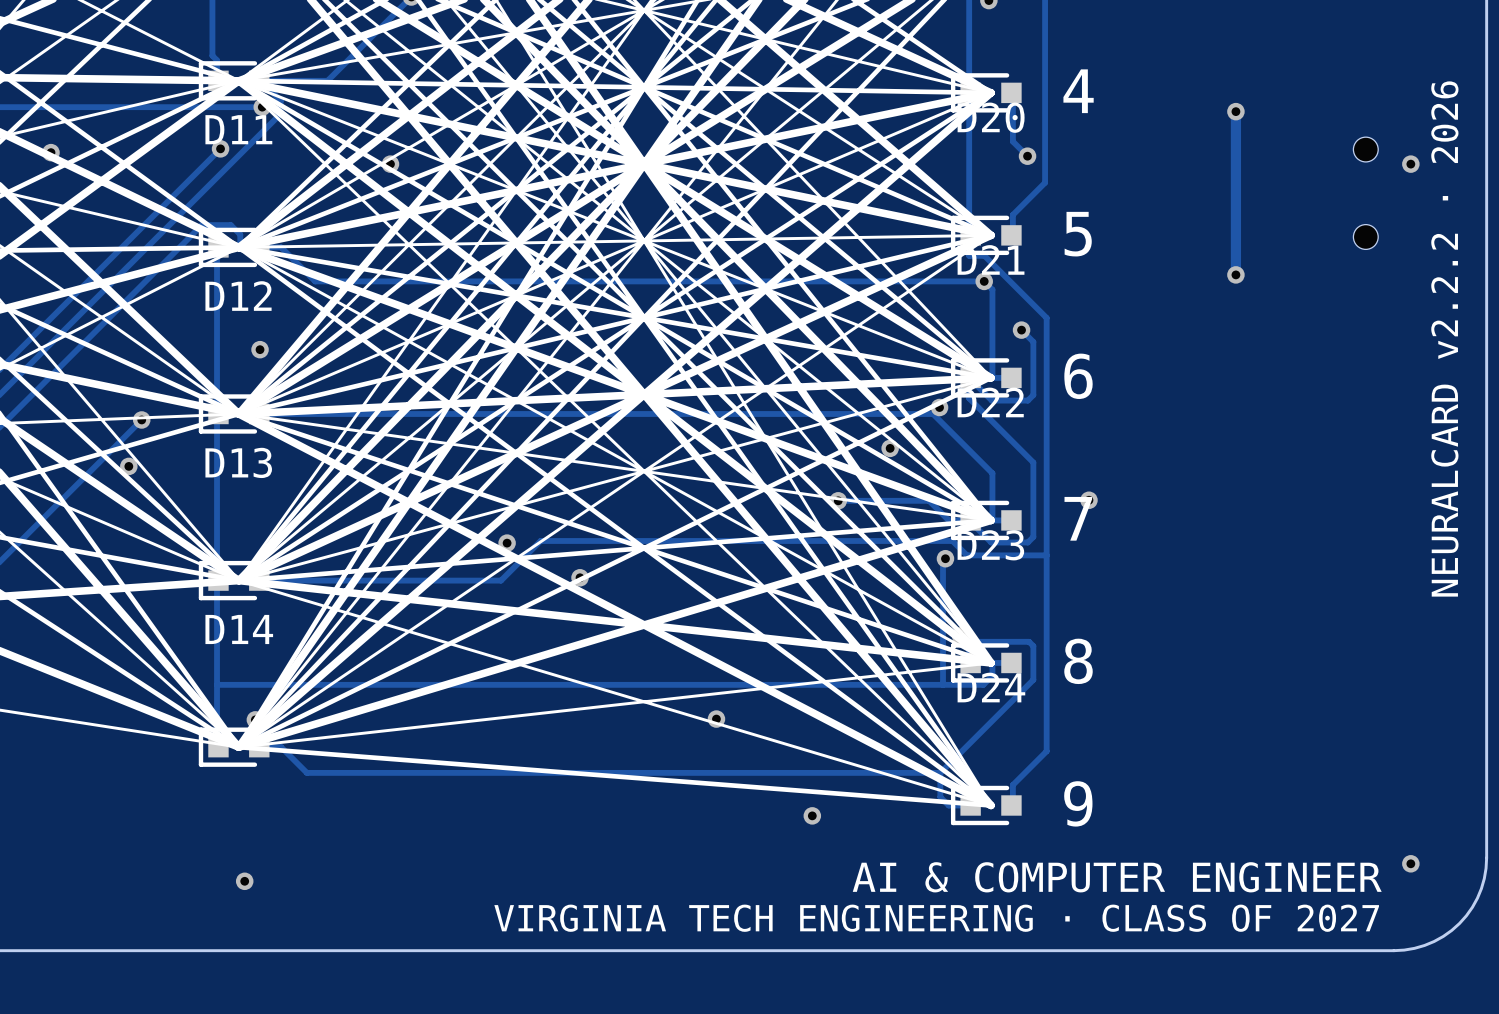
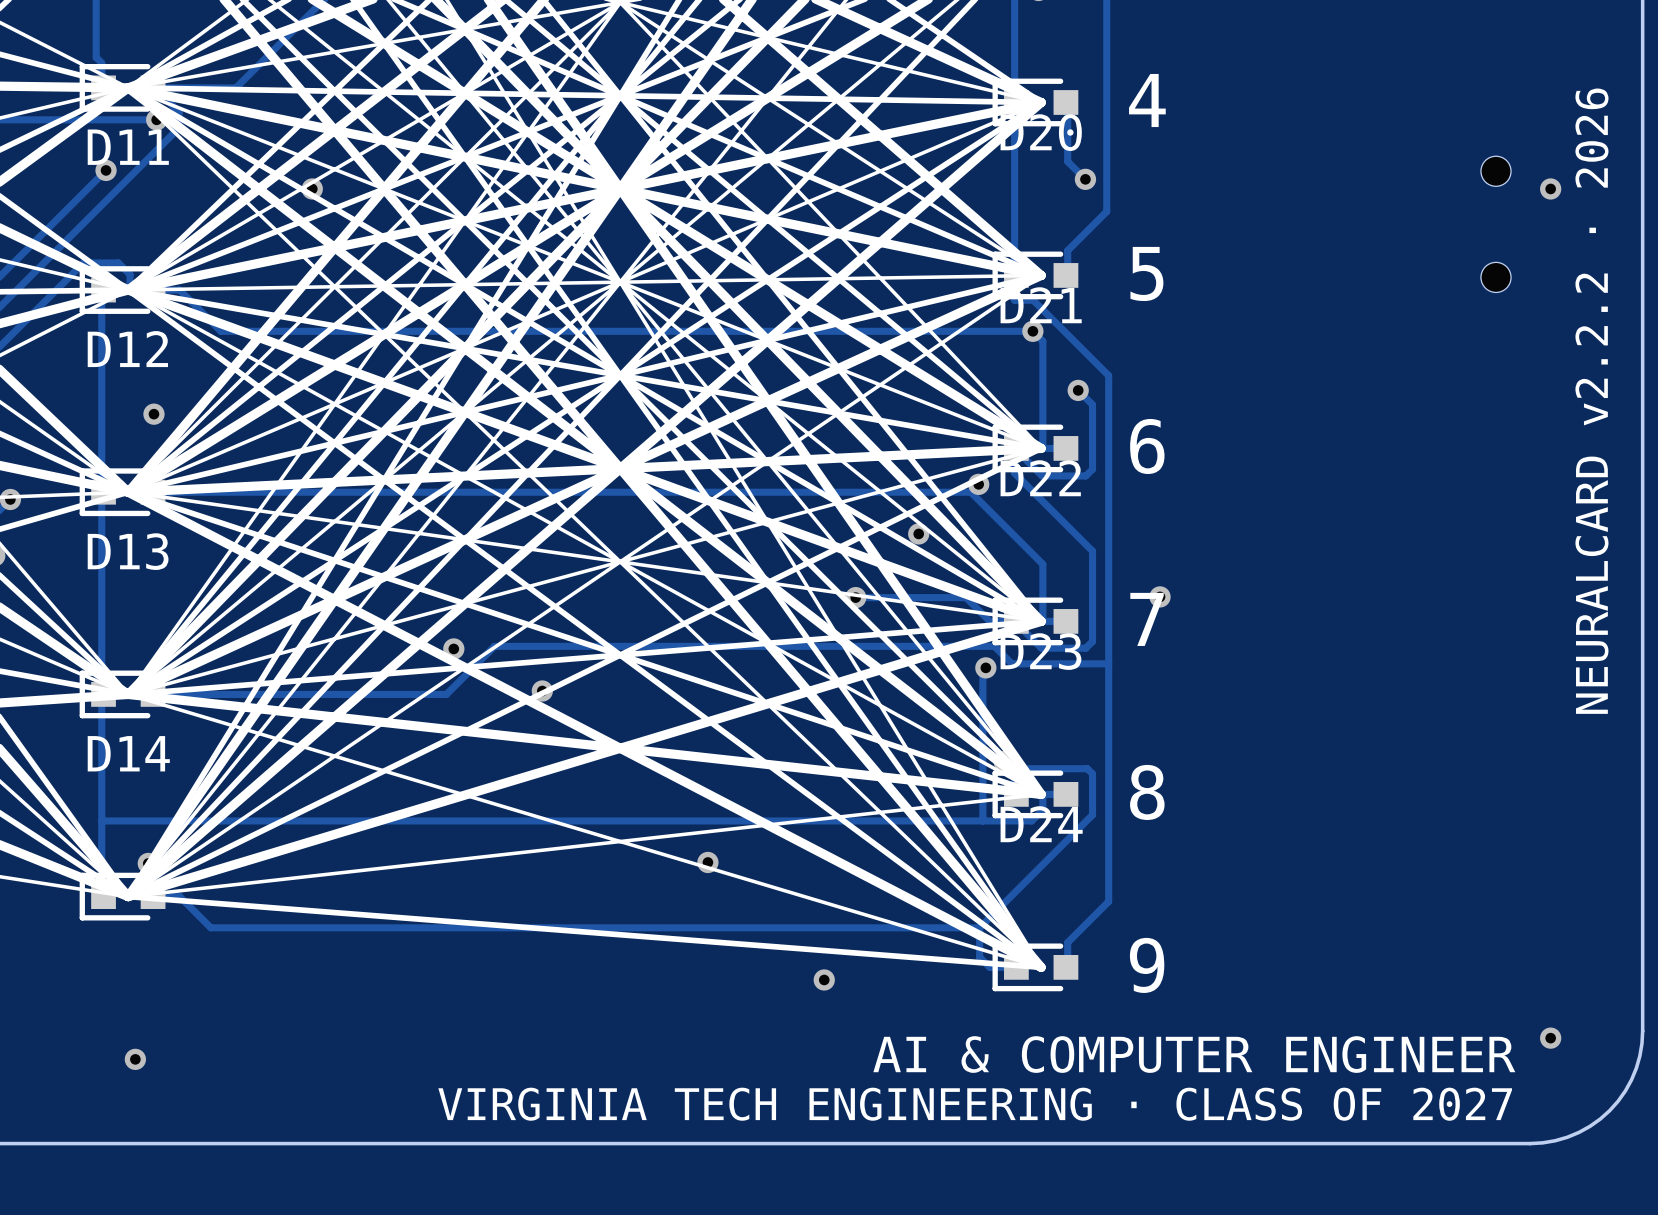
track: (1235, 111) (1235, 274) -> none
via: (1235, 111) -> none
via: (1235, 274) -> none

